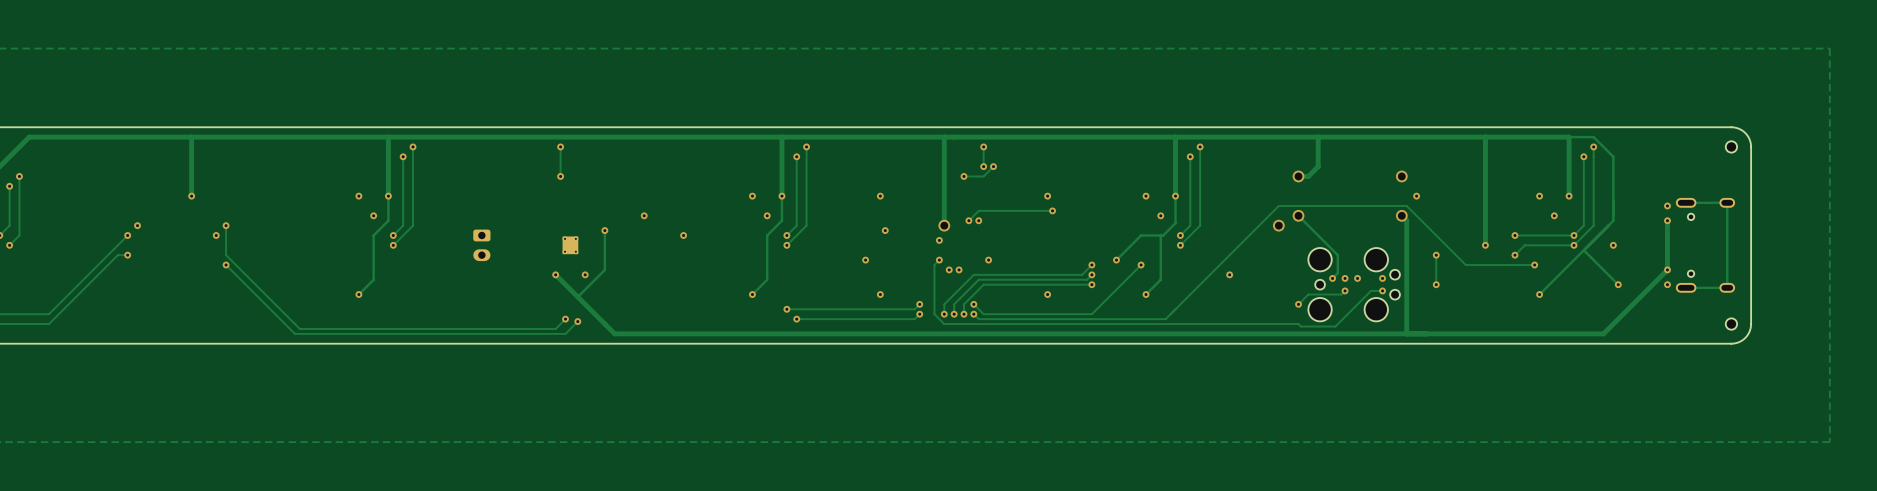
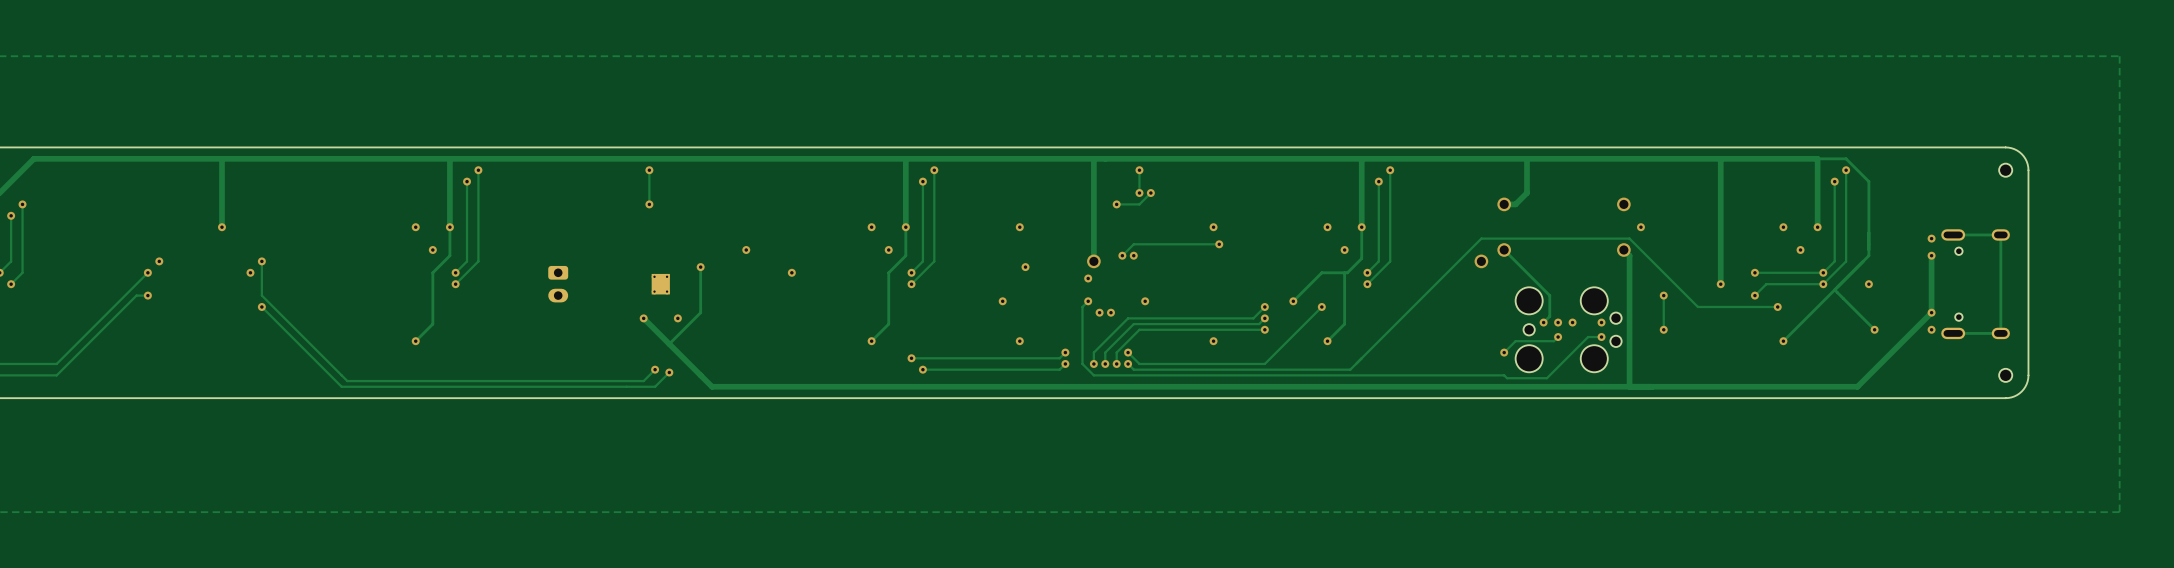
via: (1229, 274) -> none

